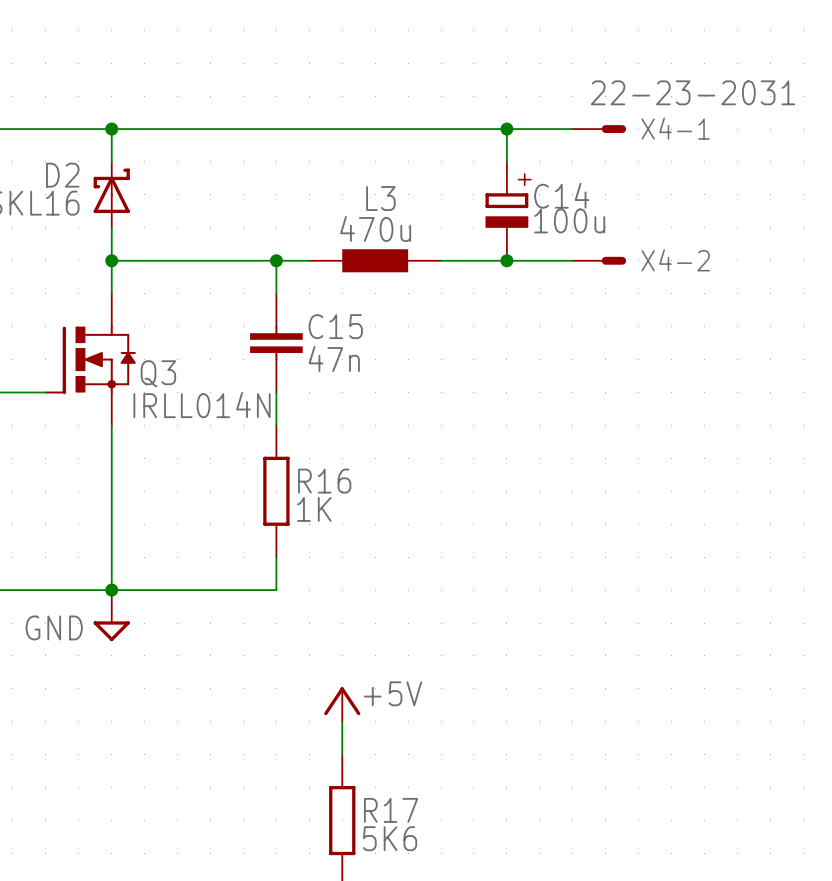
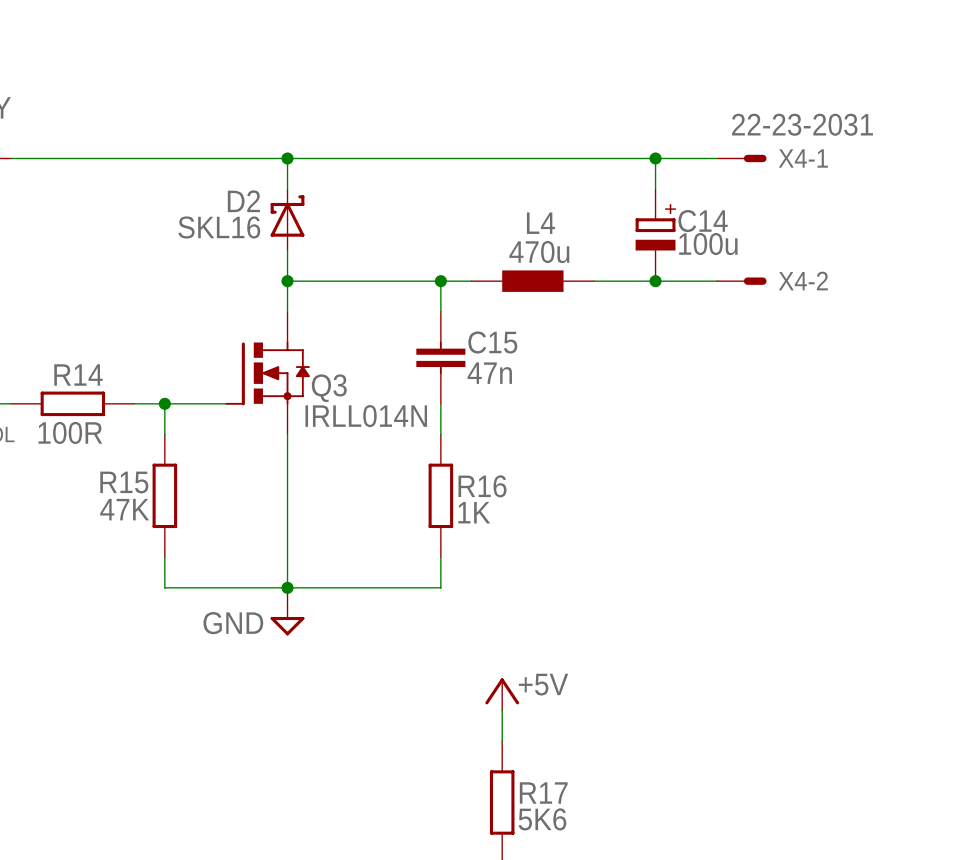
L3 name: L3 (380, 198) -> L4 (540, 223)

